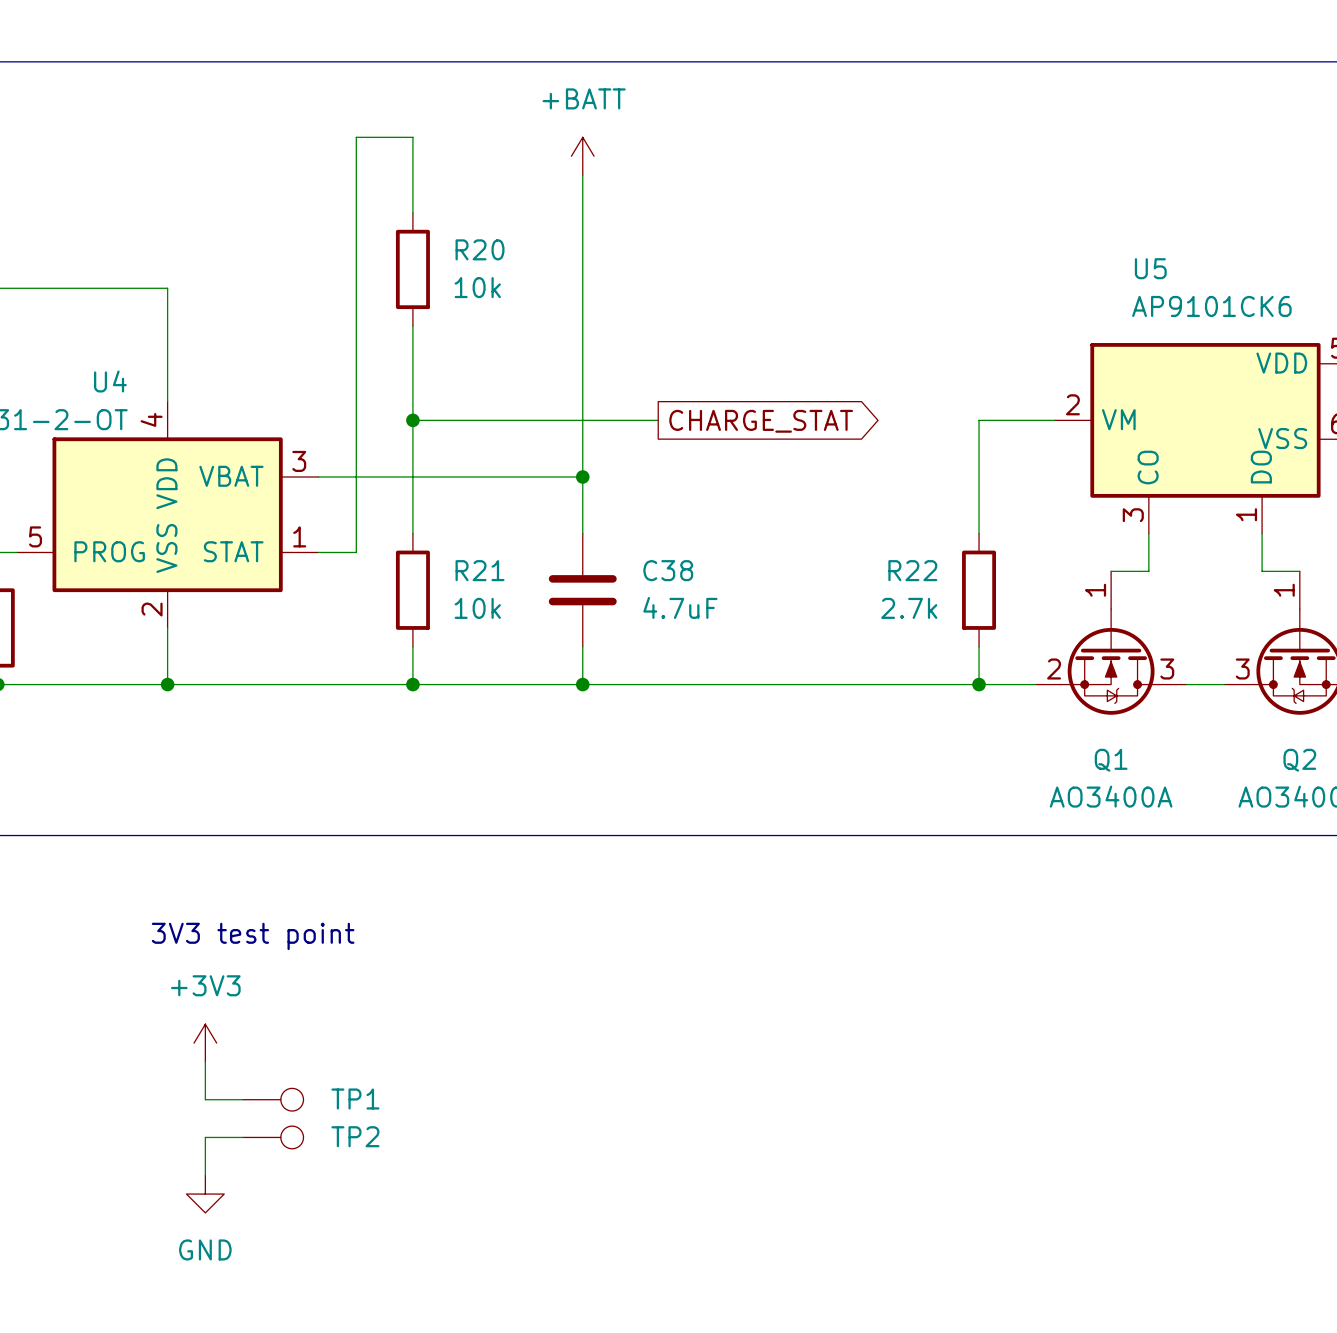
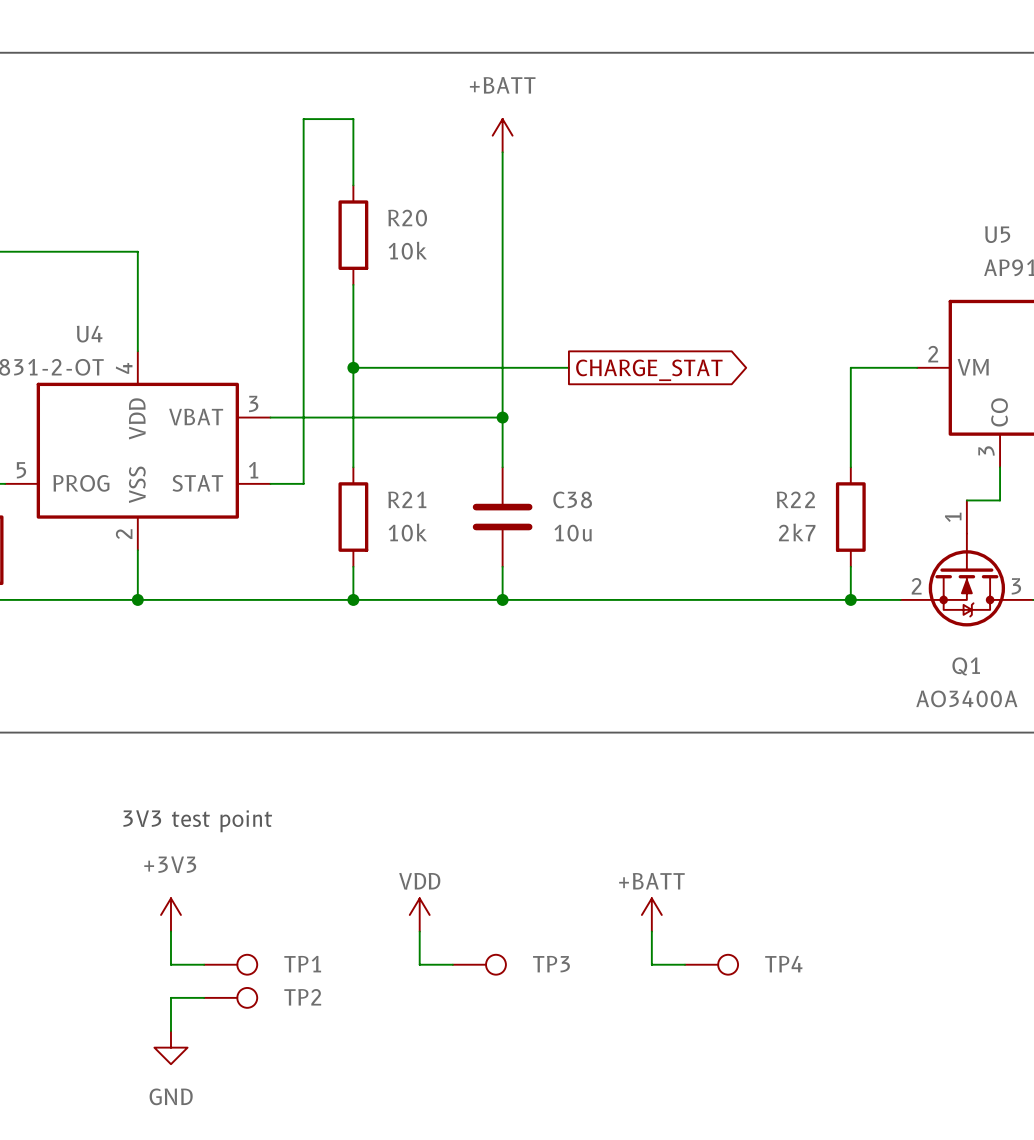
C38 value: 4.7uF (680, 607) -> 10u (573, 533)
R22 value: 2.7k (909, 608) -> 2k7 (797, 532)
power symbol: none -> VDD (419, 914)
power symbol: none -> +BATT (651, 914)
wire: none -> (419, 931) (419, 964) (452, 964)
wire: none -> (651, 931) (651, 964) (685, 964)
TP3: none -> (479, 964)
TP4: none -> (711, 964)

